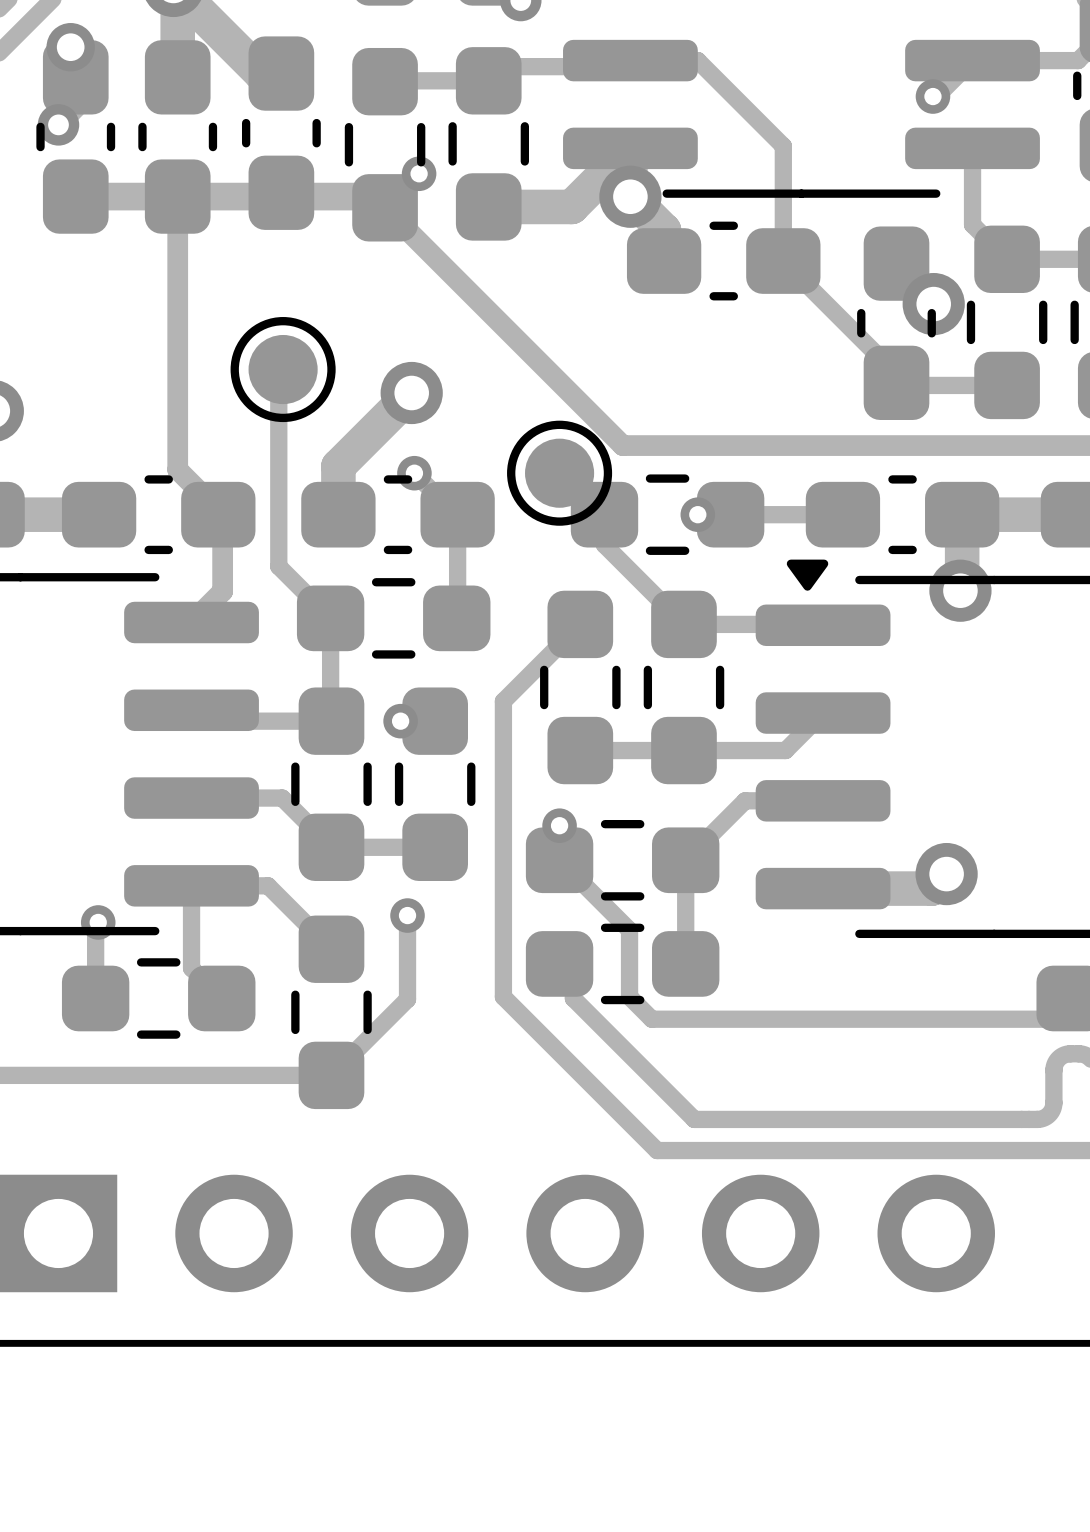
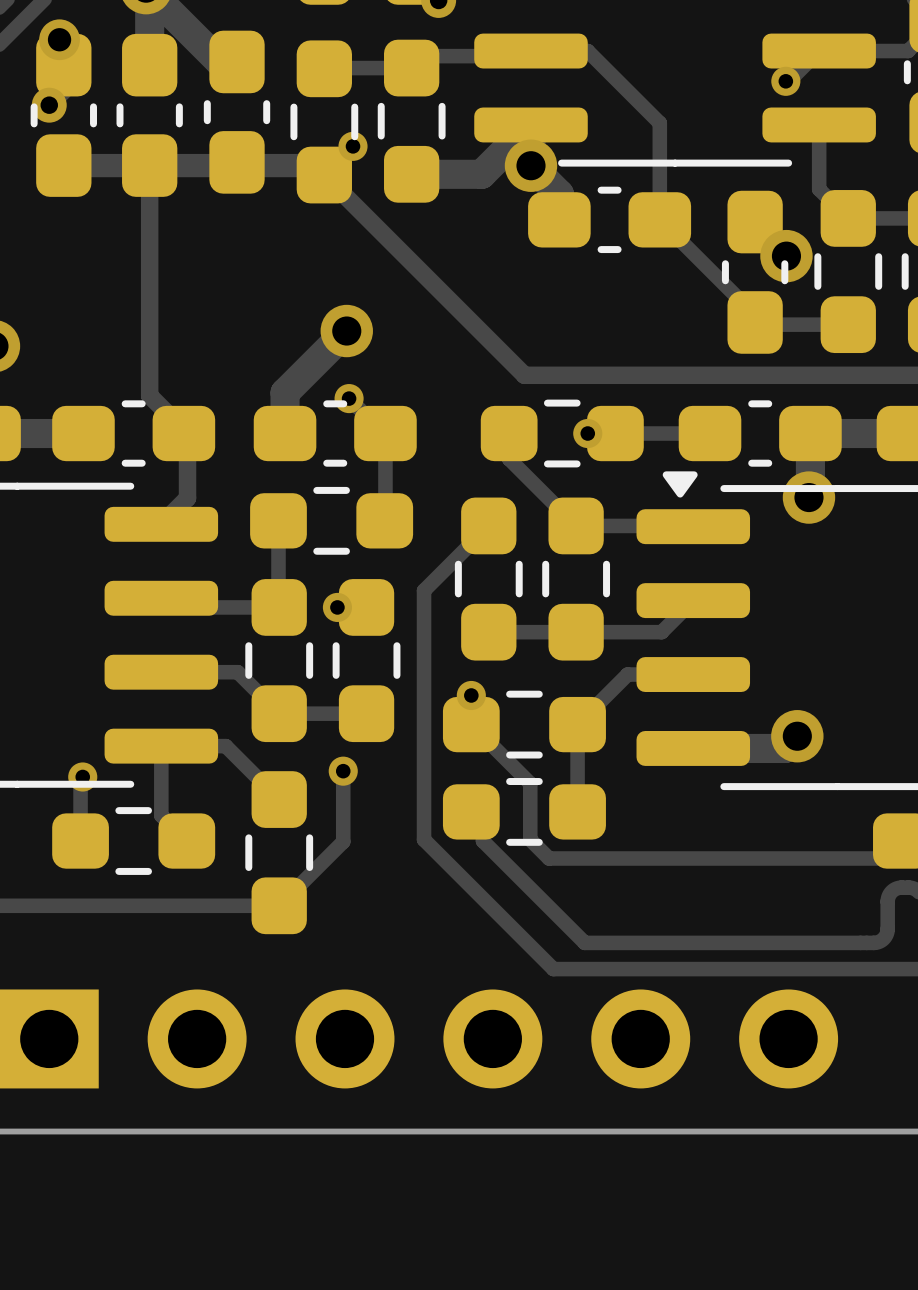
track: (283, 369) (278, 373) (278, 566) (330, 618) -> none
part: (283, 369) -> none
part: (559, 473) -> none

